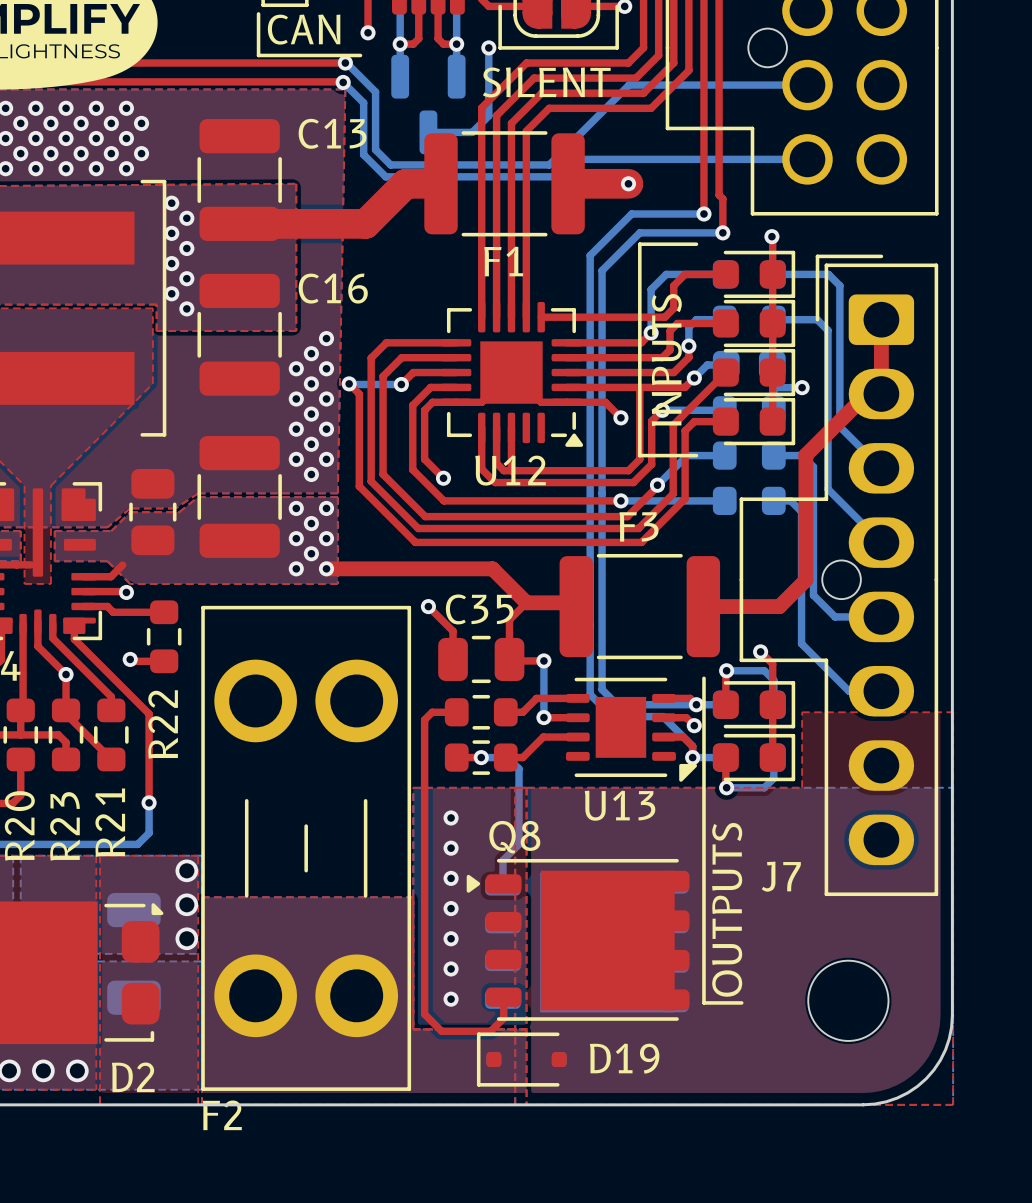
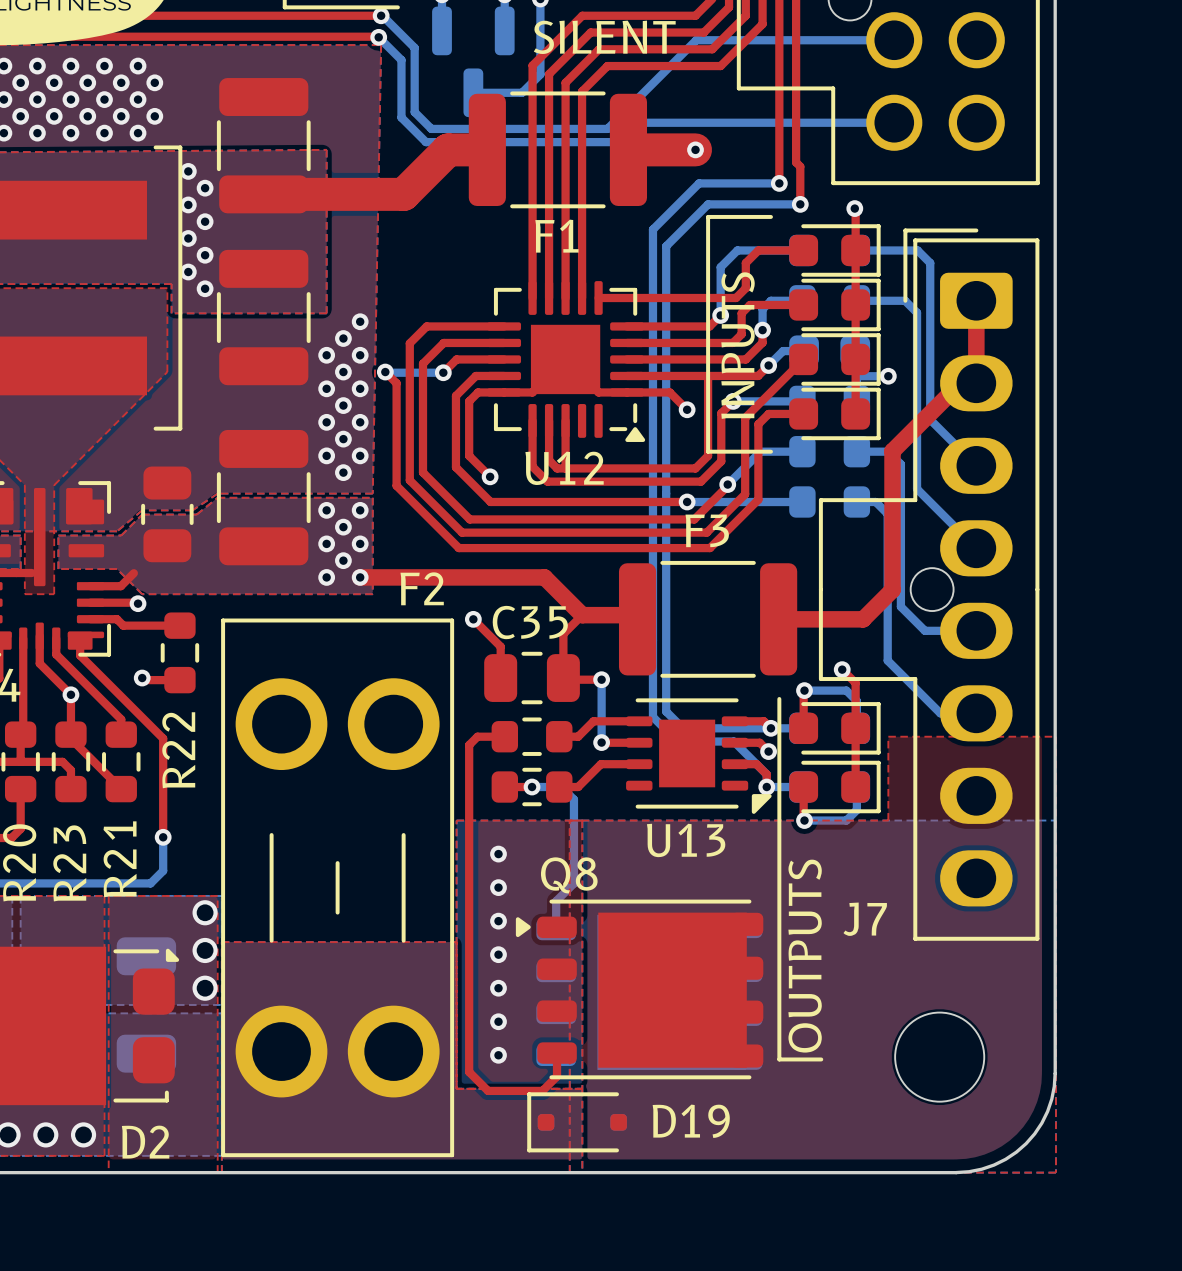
C13 name: C13 (332, 133) -> none
C16 name: C16 (333, 288) -> none
F2 name position: F2 (222, 1115) -> F2 (422, 588)

